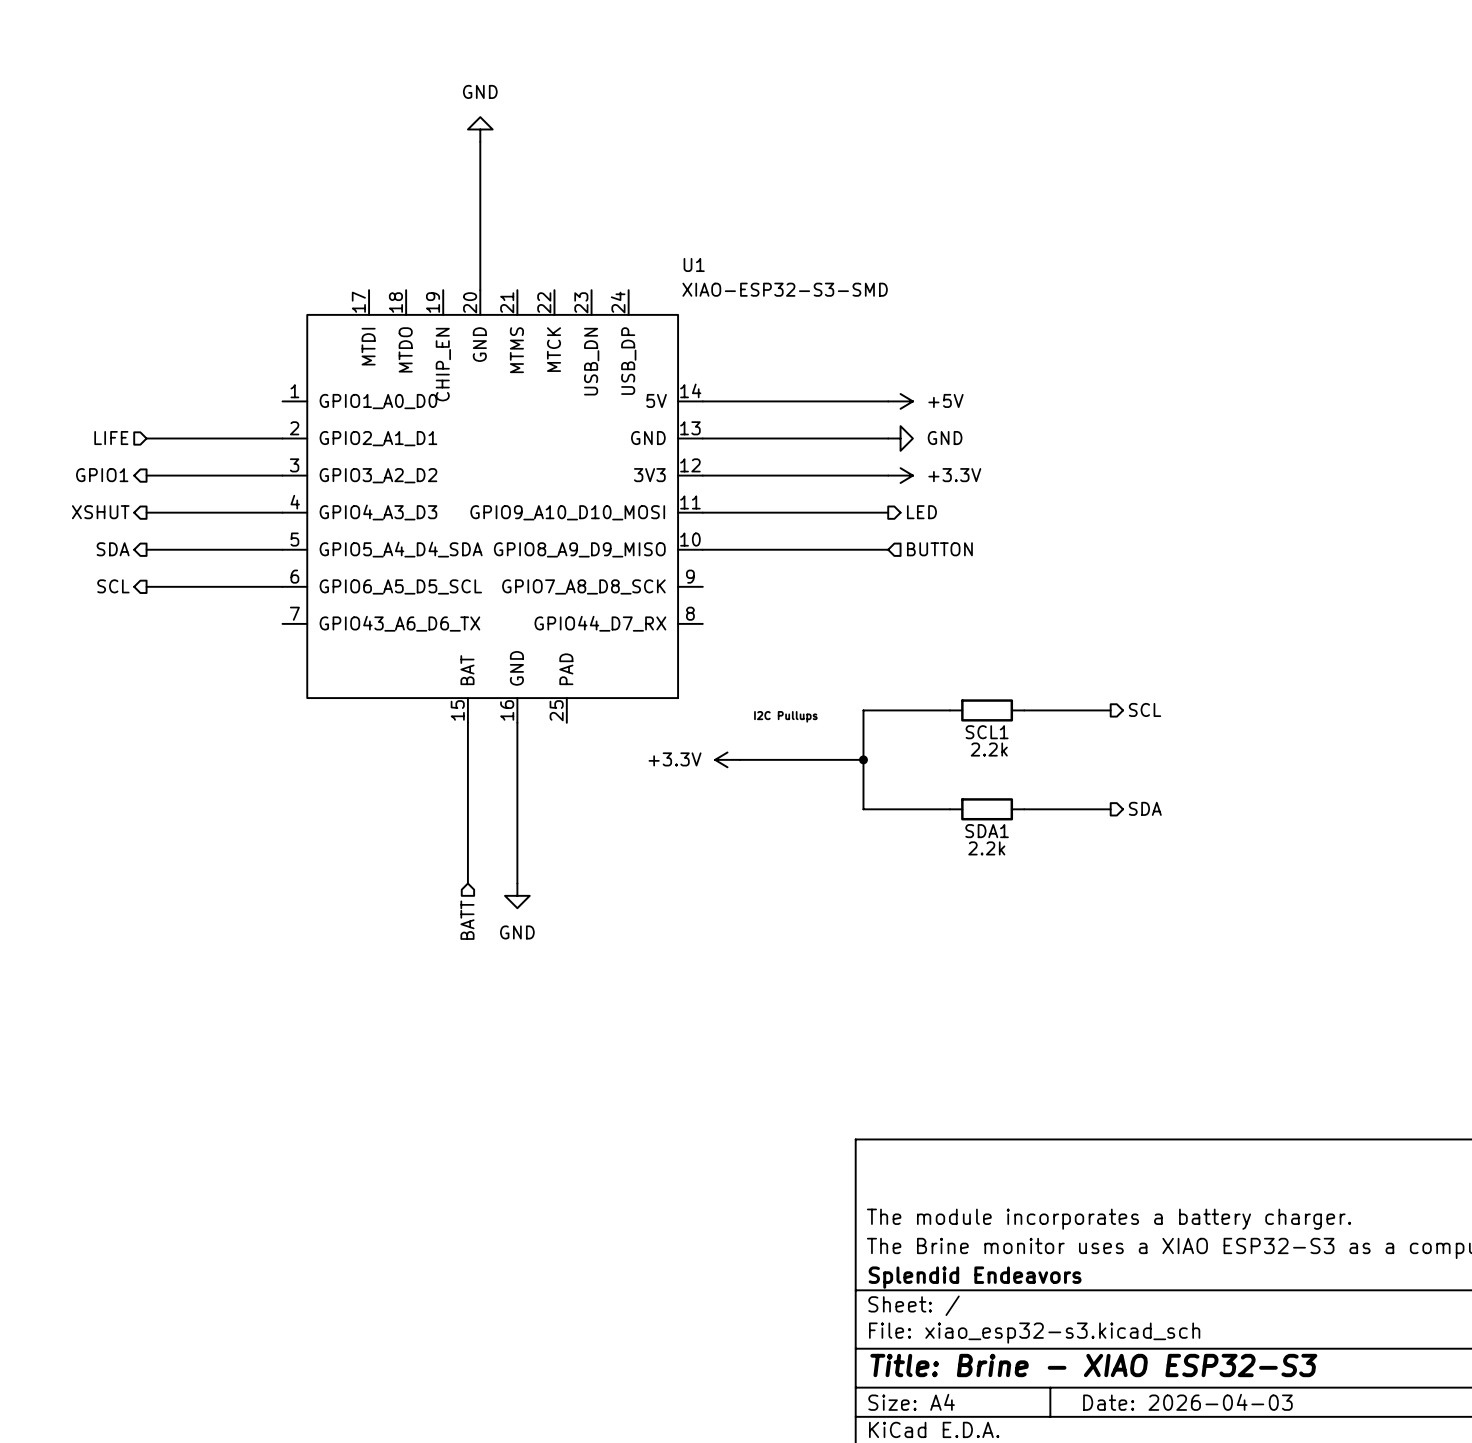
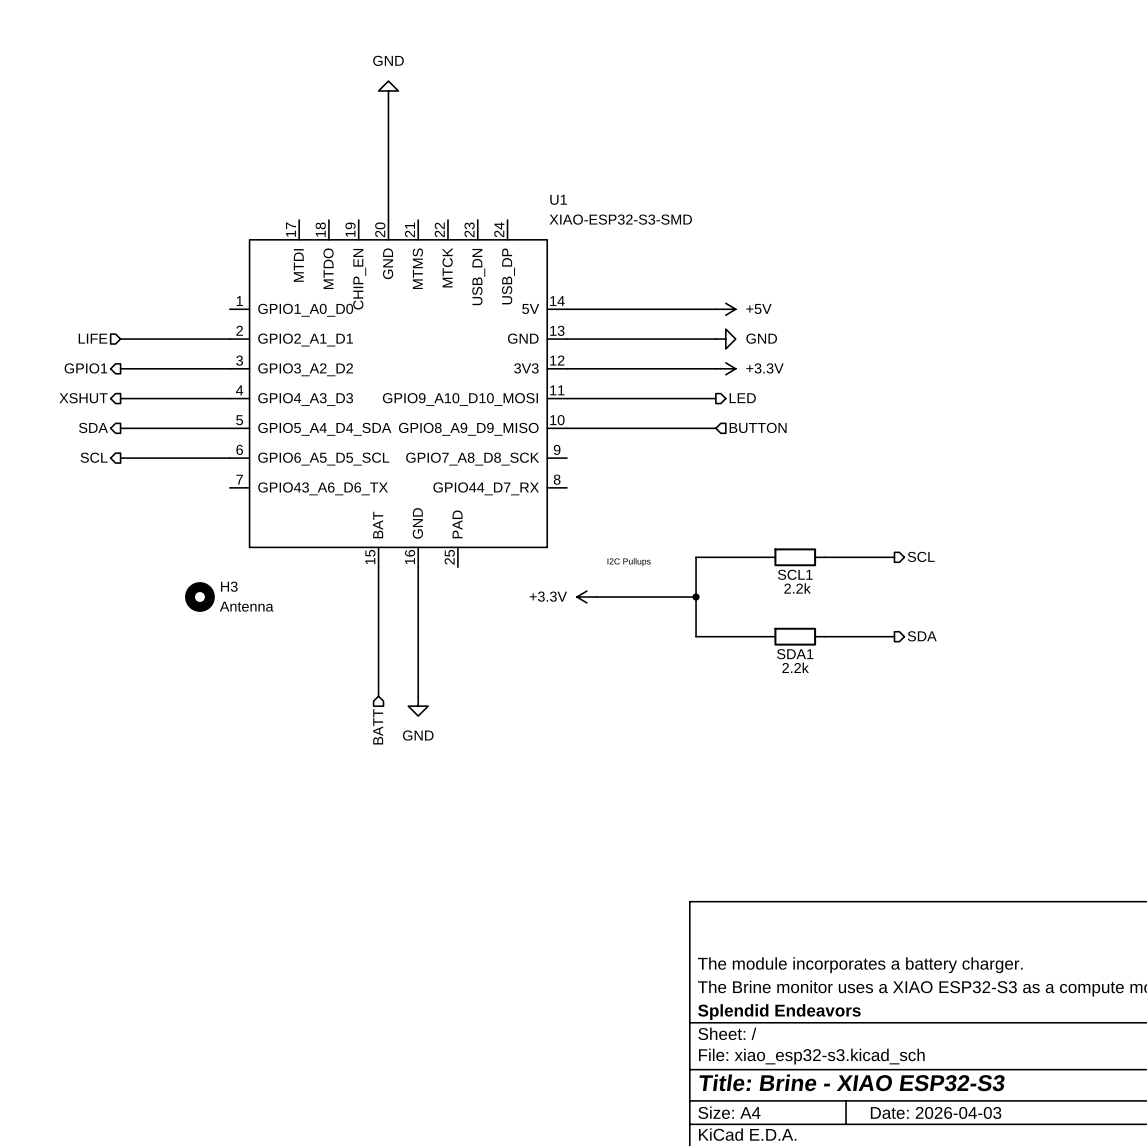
H3: none -> Antenna (199, 597)

